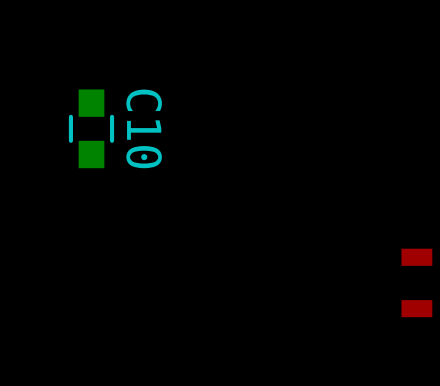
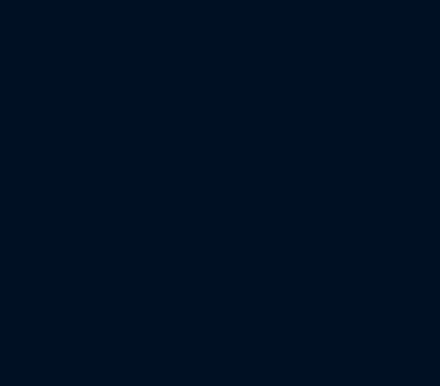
C10: (91, 128) -> none
part: (416, 282) -> none

